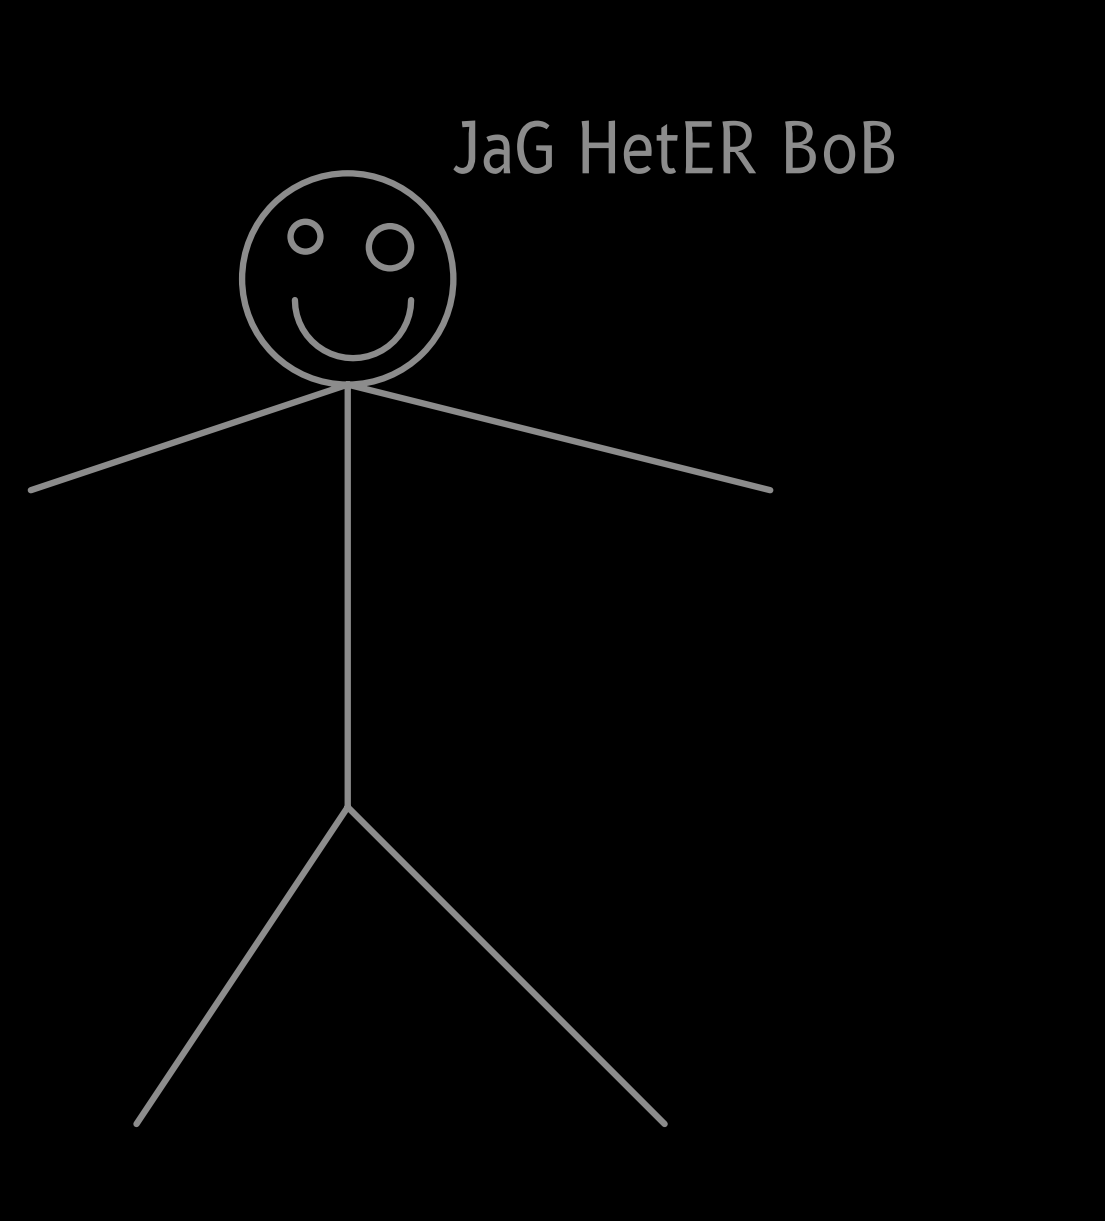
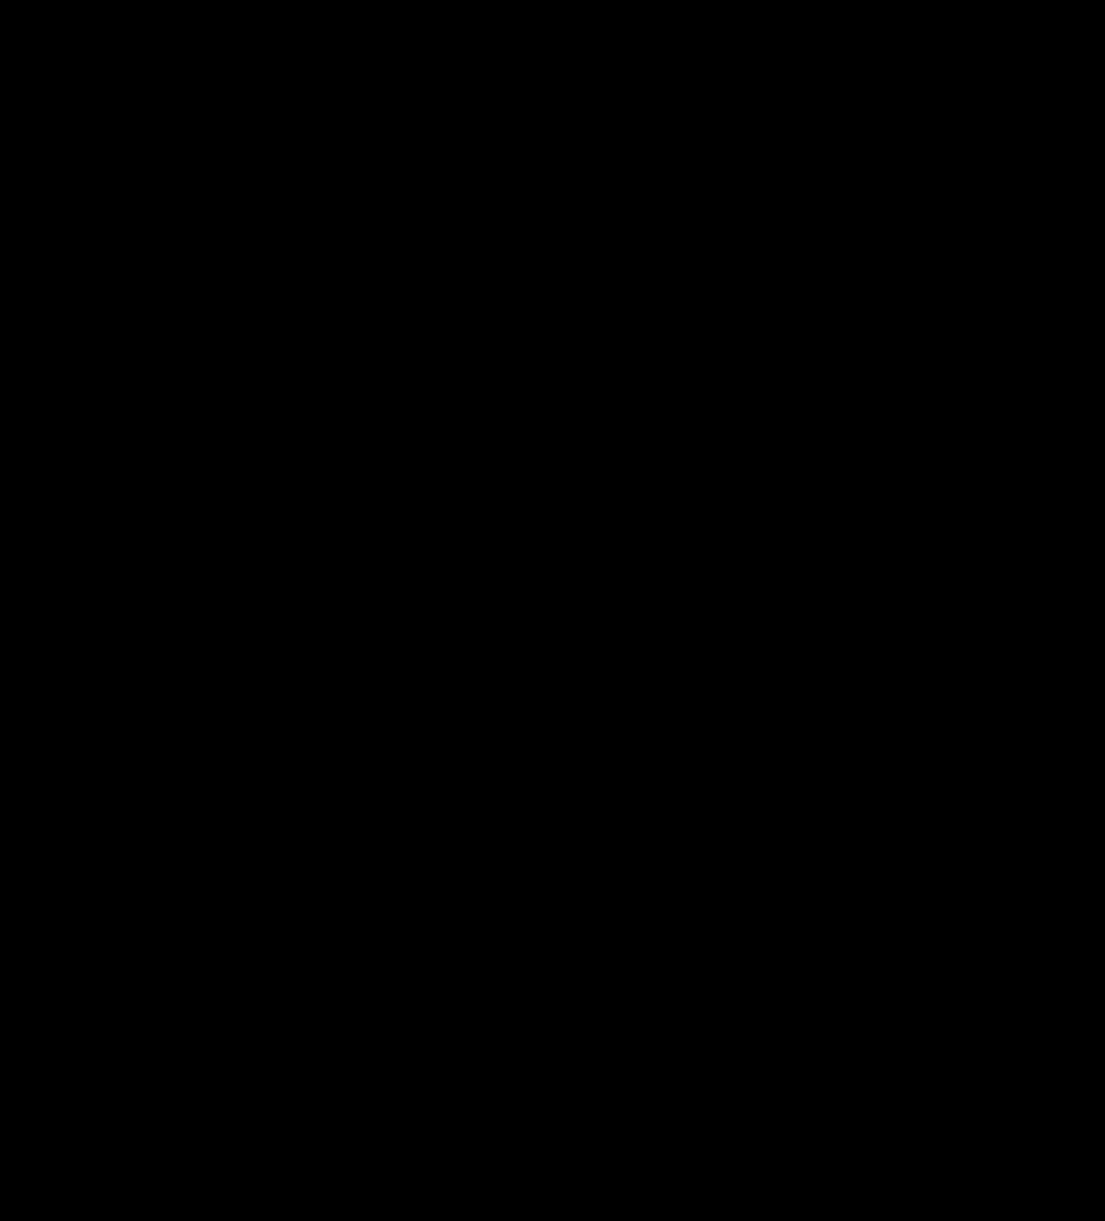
text: JaG HetER BoB (673, 147) -> none
drawing: [238, 170, 457, 388] -> none
line: (294, 300) (299, 322) (311, 341) (330, 353) (353, 358) (375, 353) (394, 341) (406, 322) (411, 300) -> none
line: (347, 384) (347, 807) -> none
line: (347, 384) (770, 490) -> none
line: (347, 384) (30, 490) -> none
line: (347, 807) (136, 1124) -> none
line: (347, 807) (664, 1124) -> none

